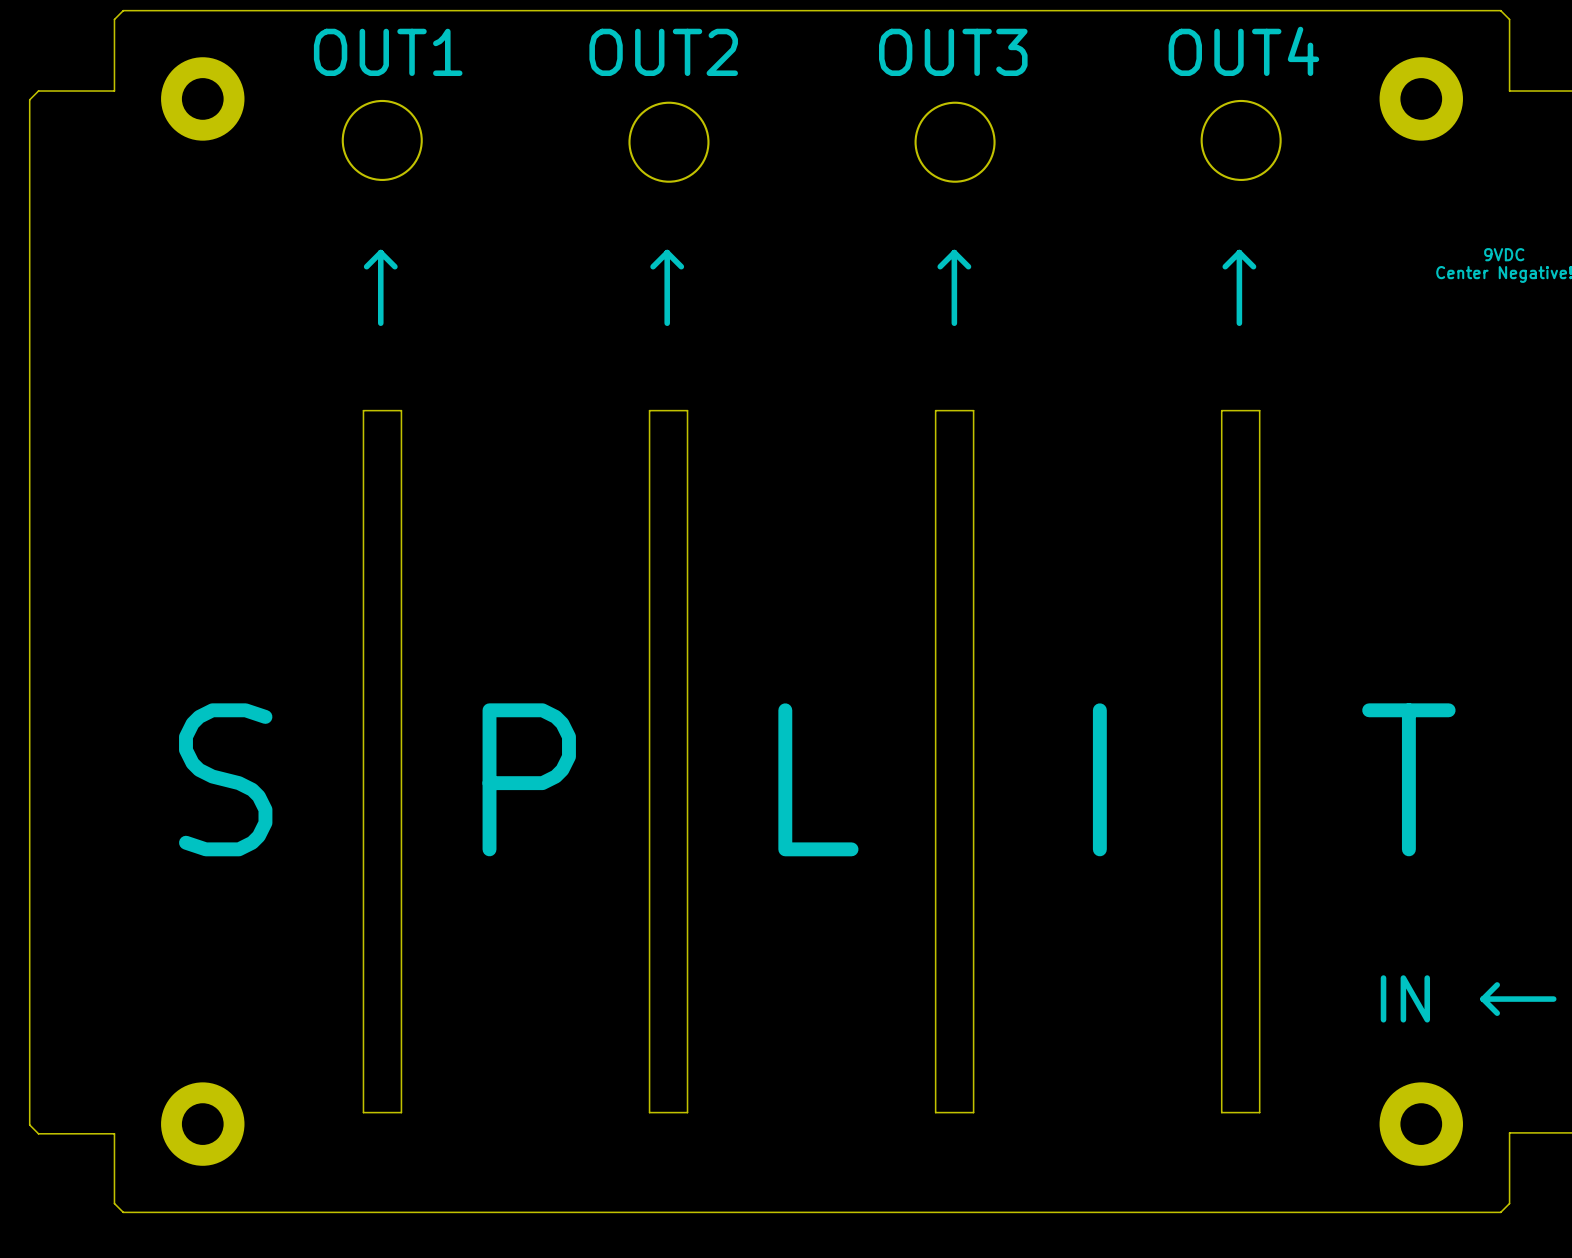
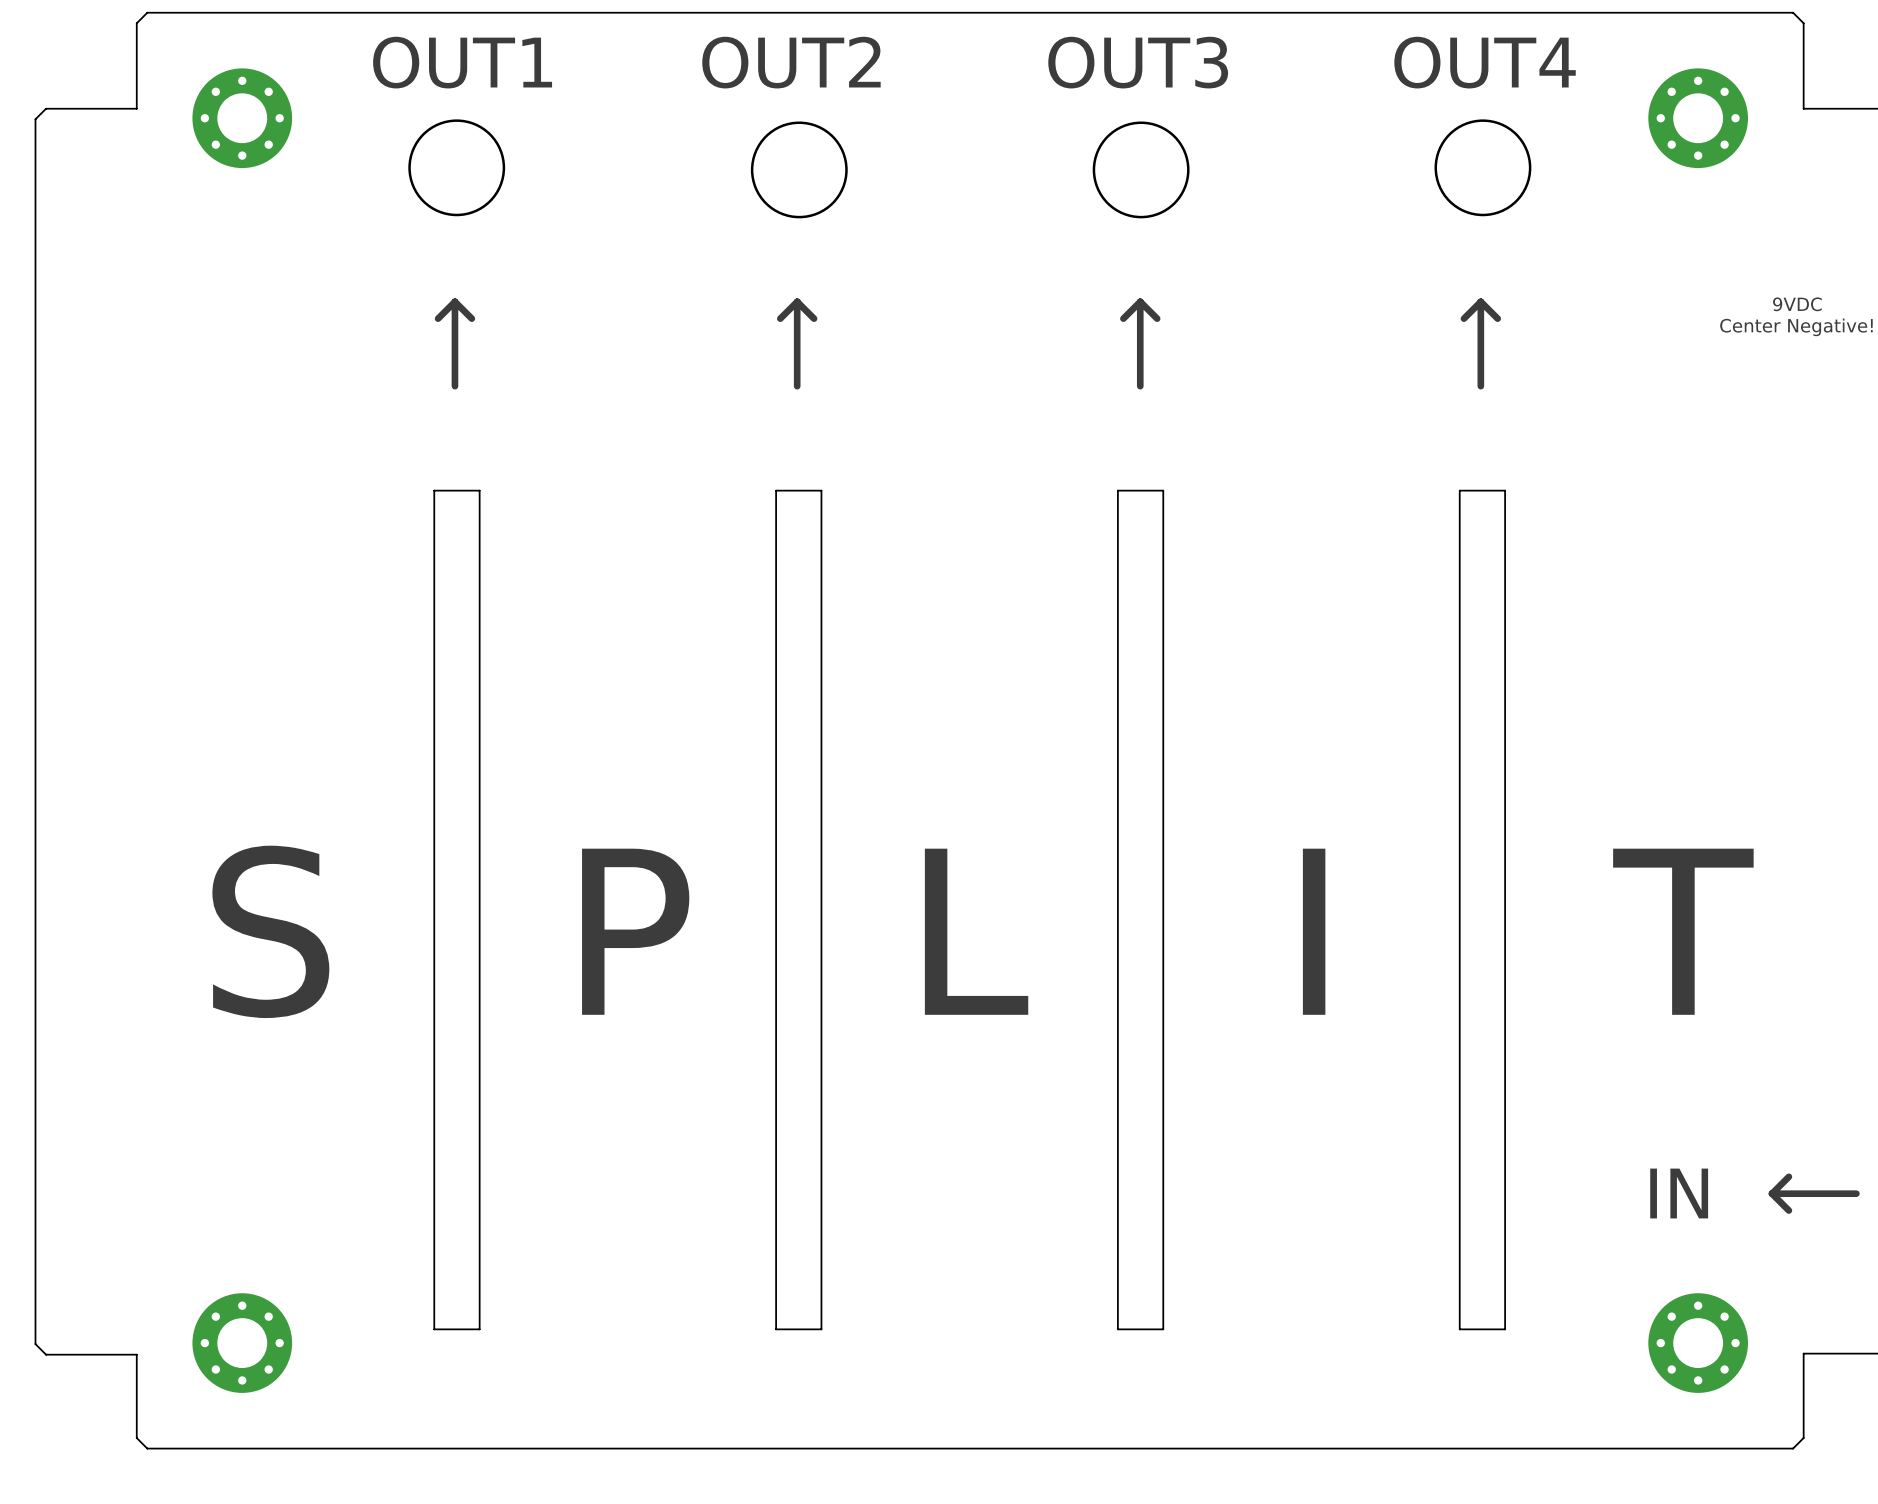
part footprint: [161, 57, 245, 141] -> [192, 68, 293, 169]
part footprint: [1379, 57, 1463, 141] -> [1648, 68, 1748, 169]
part footprint: [161, 1082, 245, 1166] -> [192, 1293, 293, 1393]
part footprint: [1379, 1082, 1463, 1166] -> [1648, 1293, 1748, 1393]

